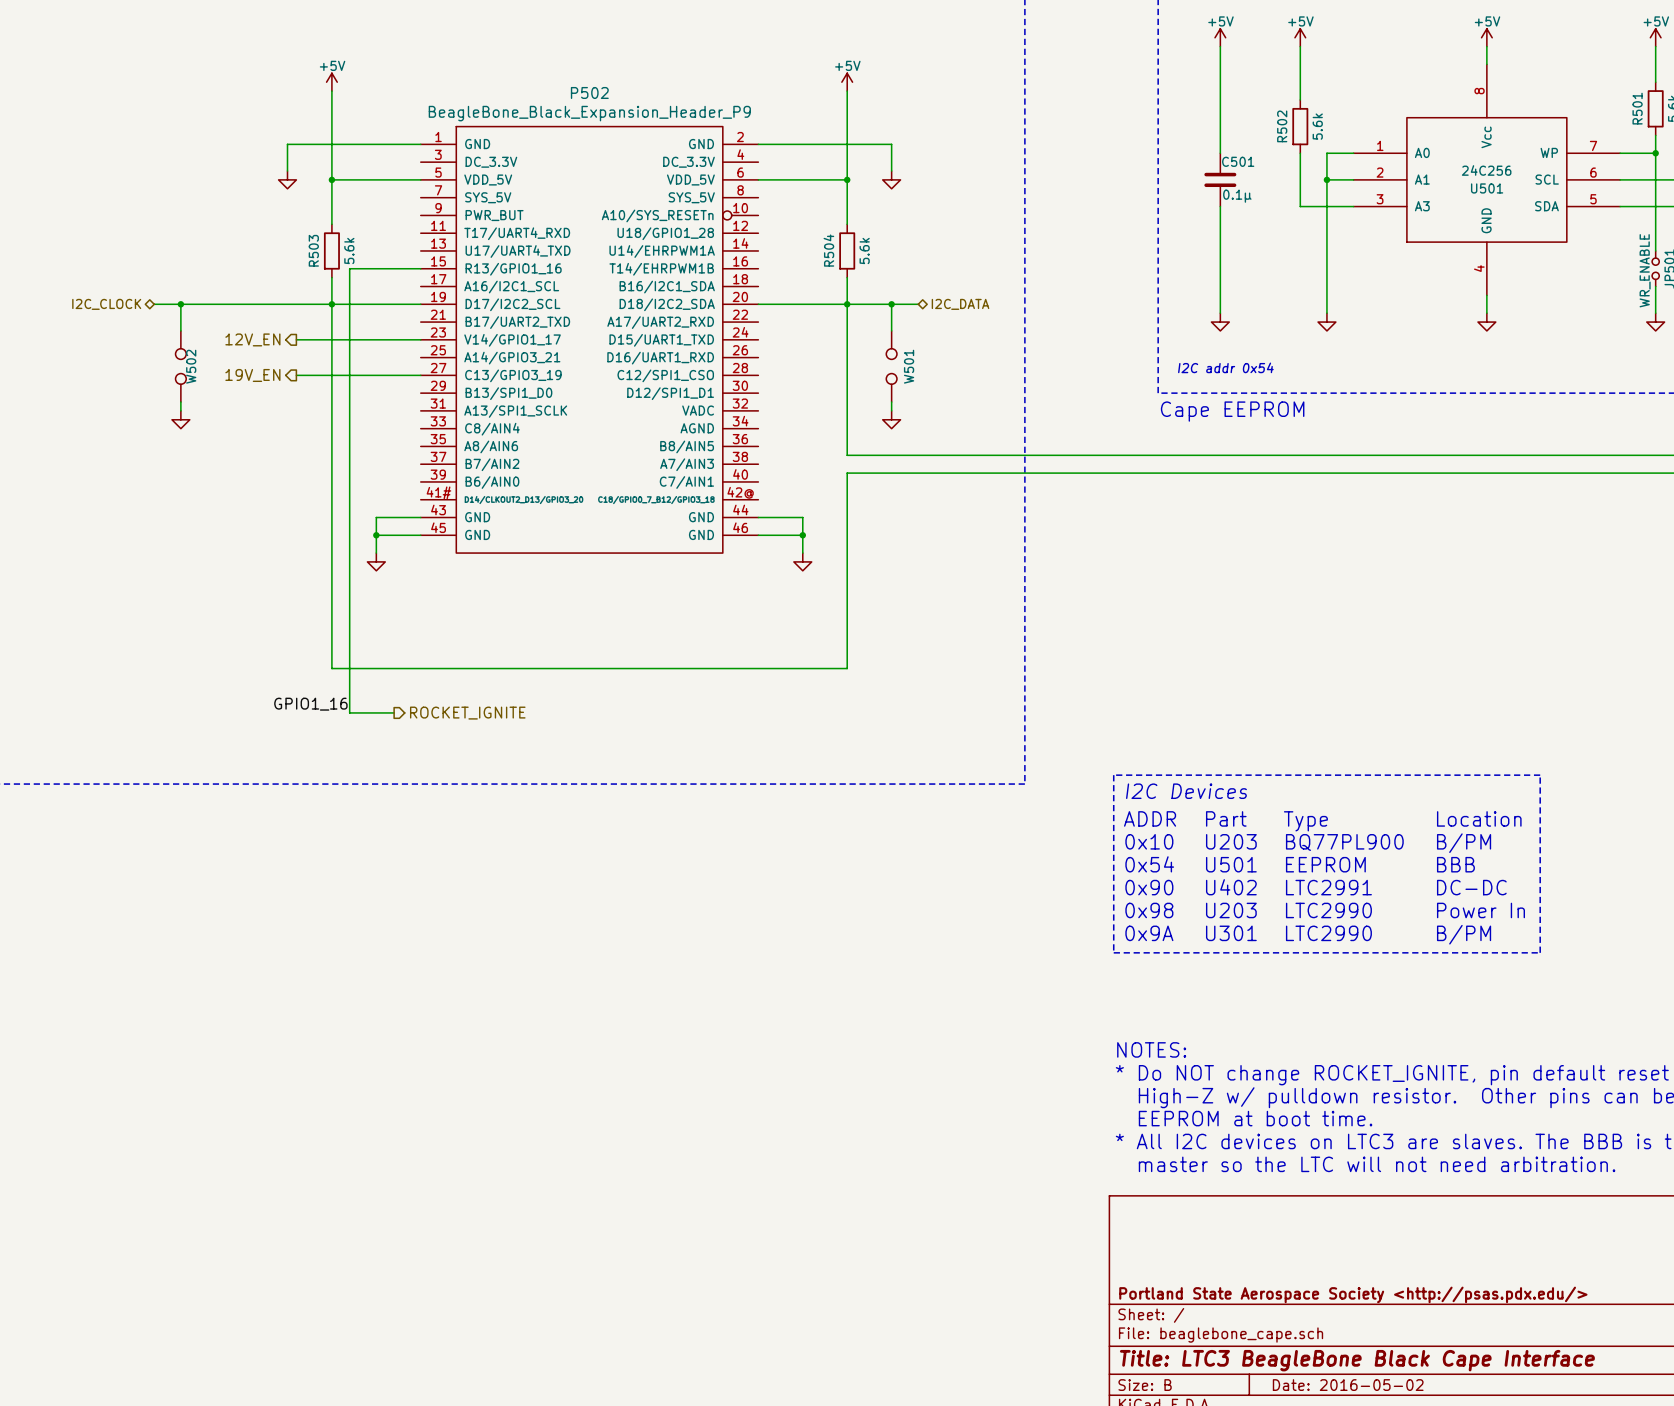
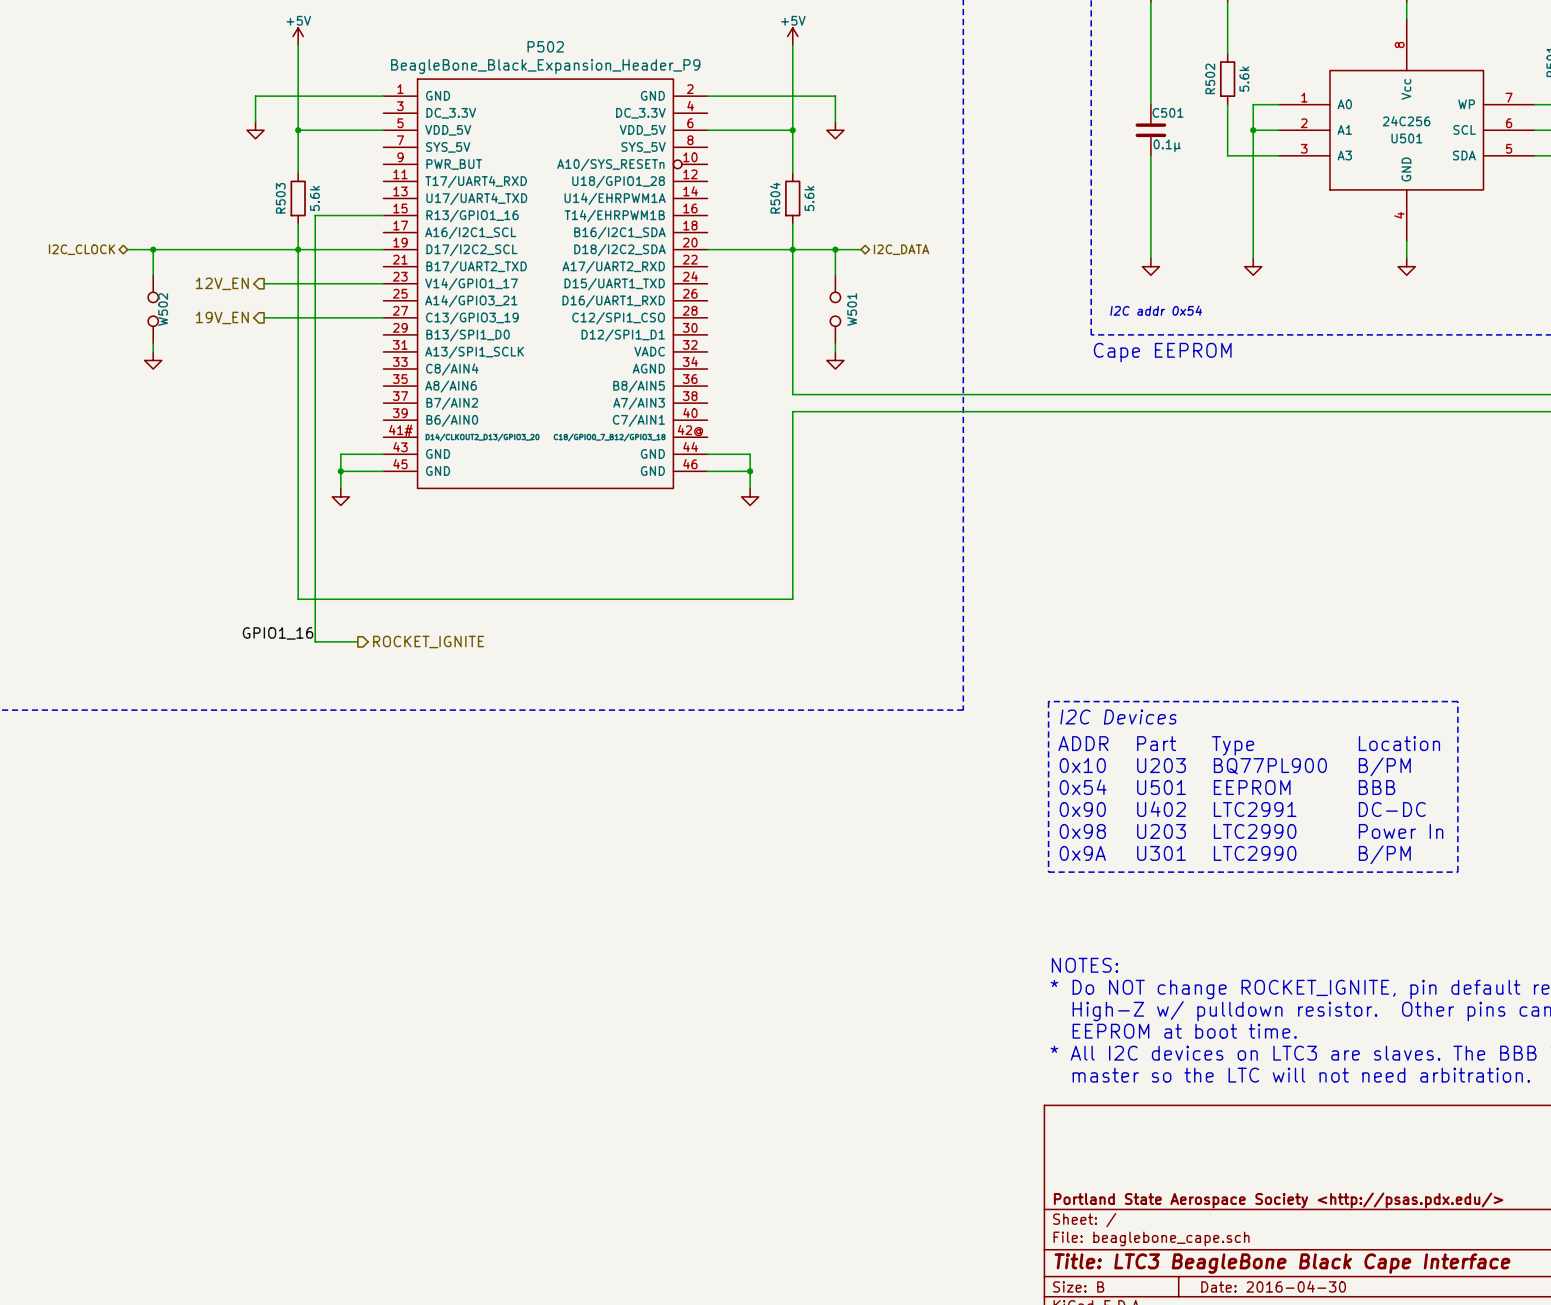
title block: Date: 2016-05-02 (1348, 1385) -> Date: 2016-04-30 (1273, 1286)

